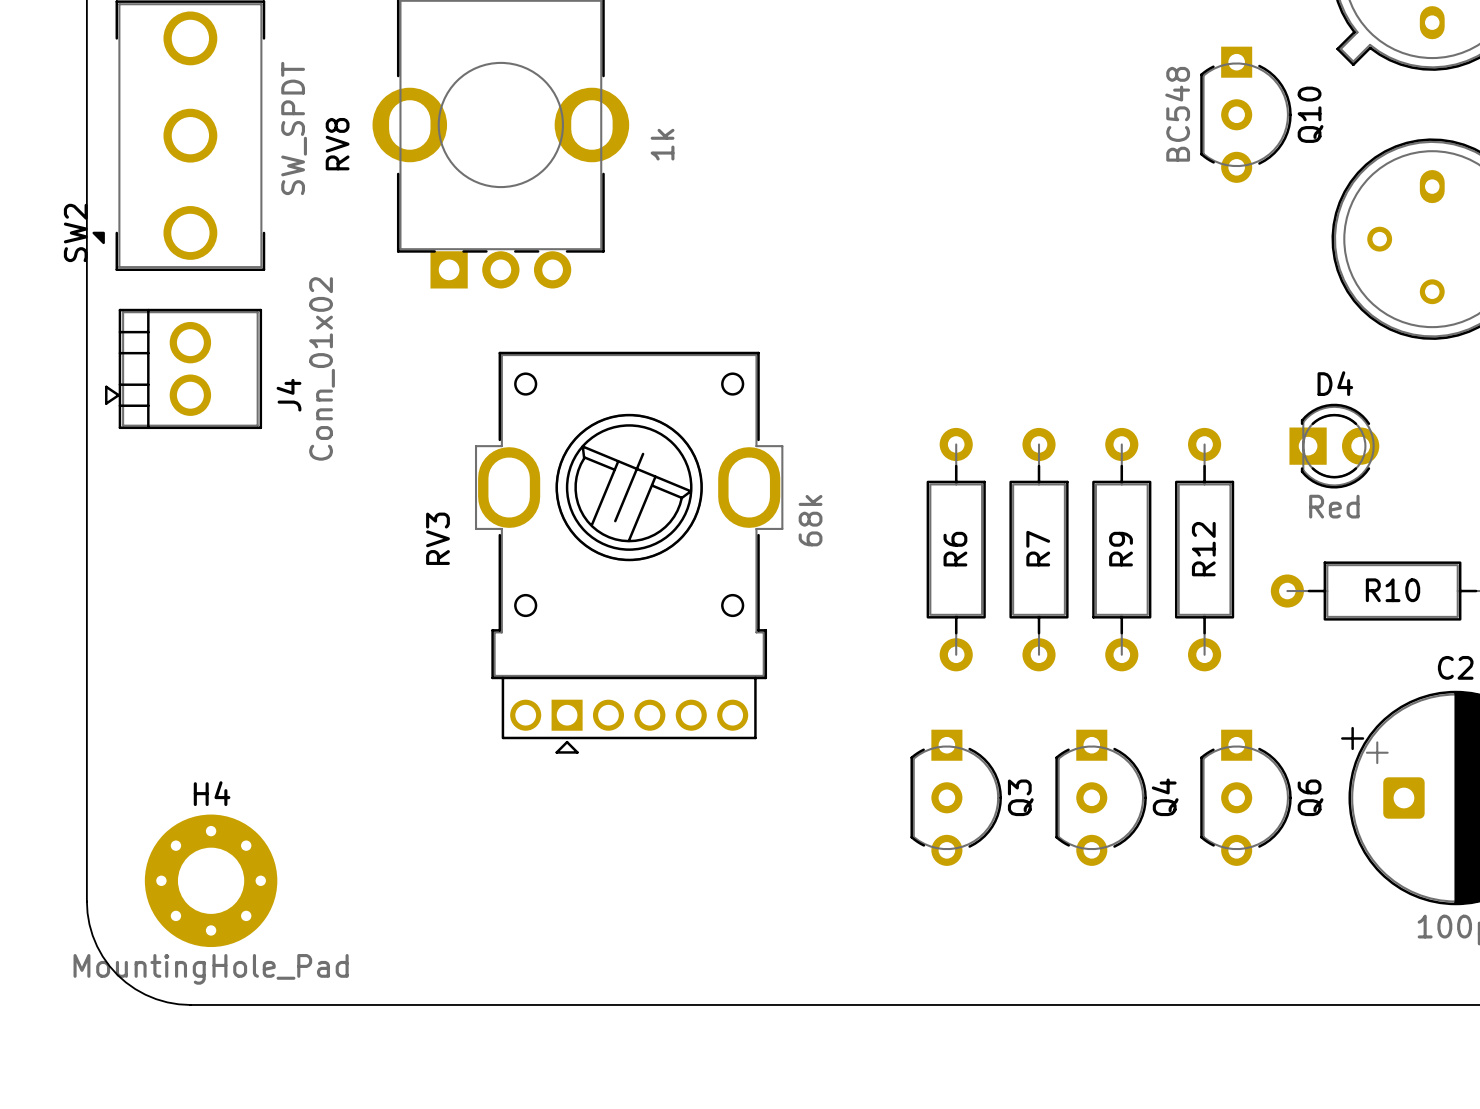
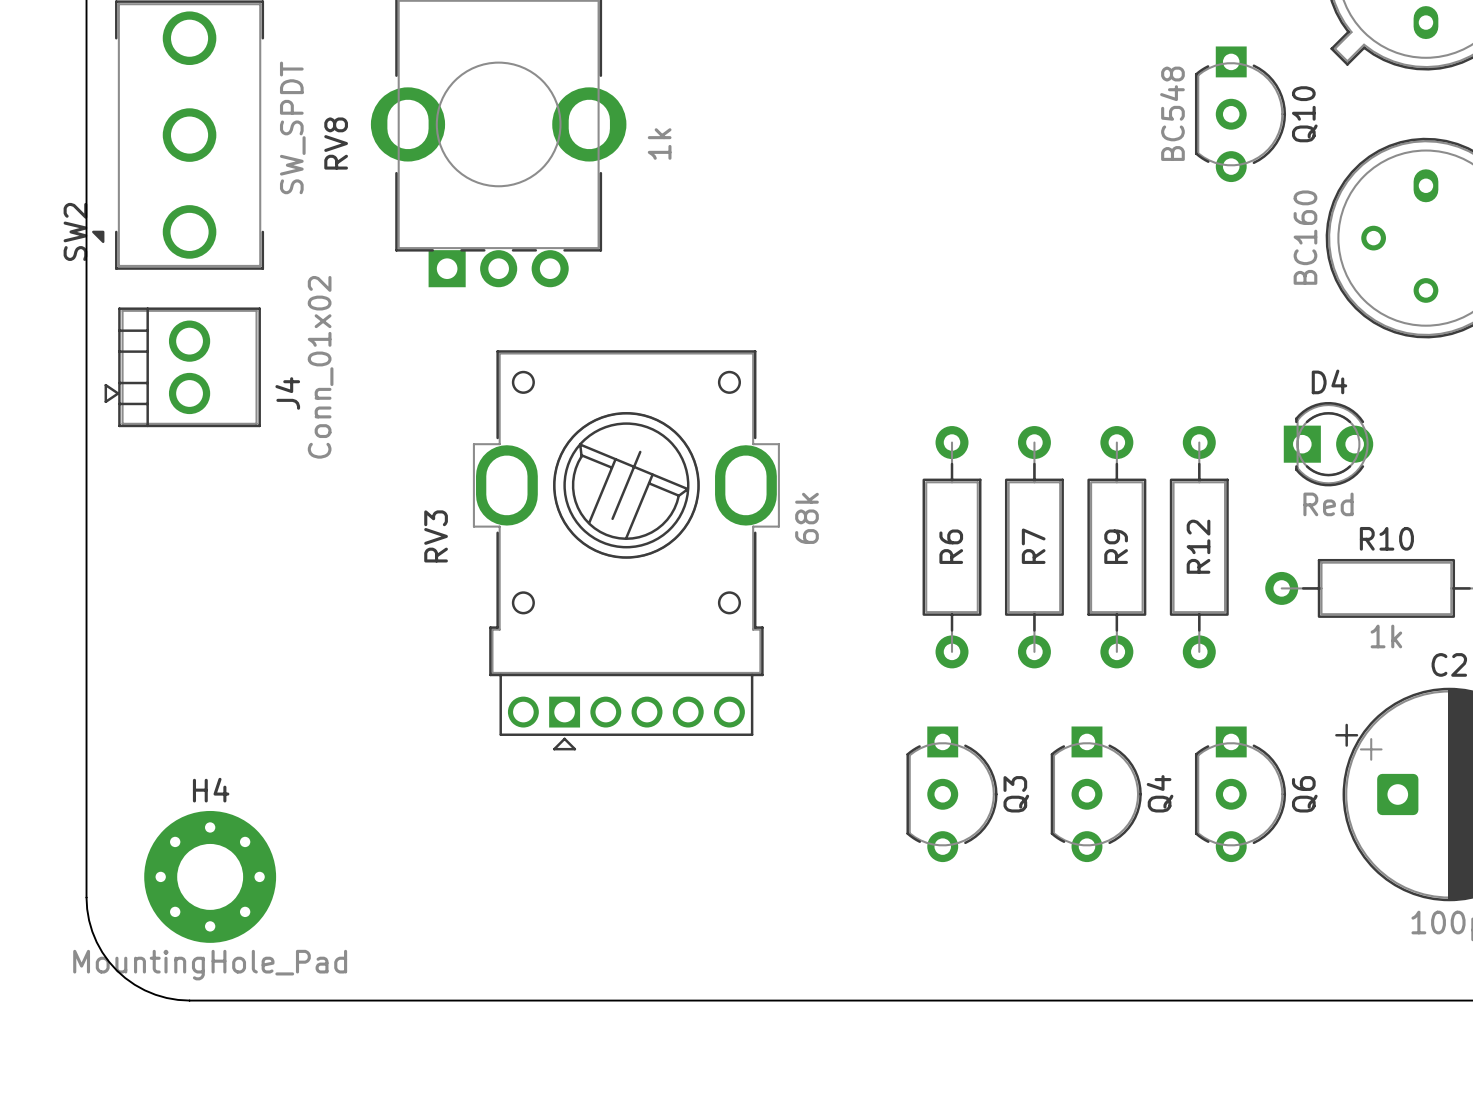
part value: none -> BC160 (1305, 237)
R10 name position: R10 (1393, 590) -> R10 (1386, 538)
R10 value: none -> 1k (1386, 636)

